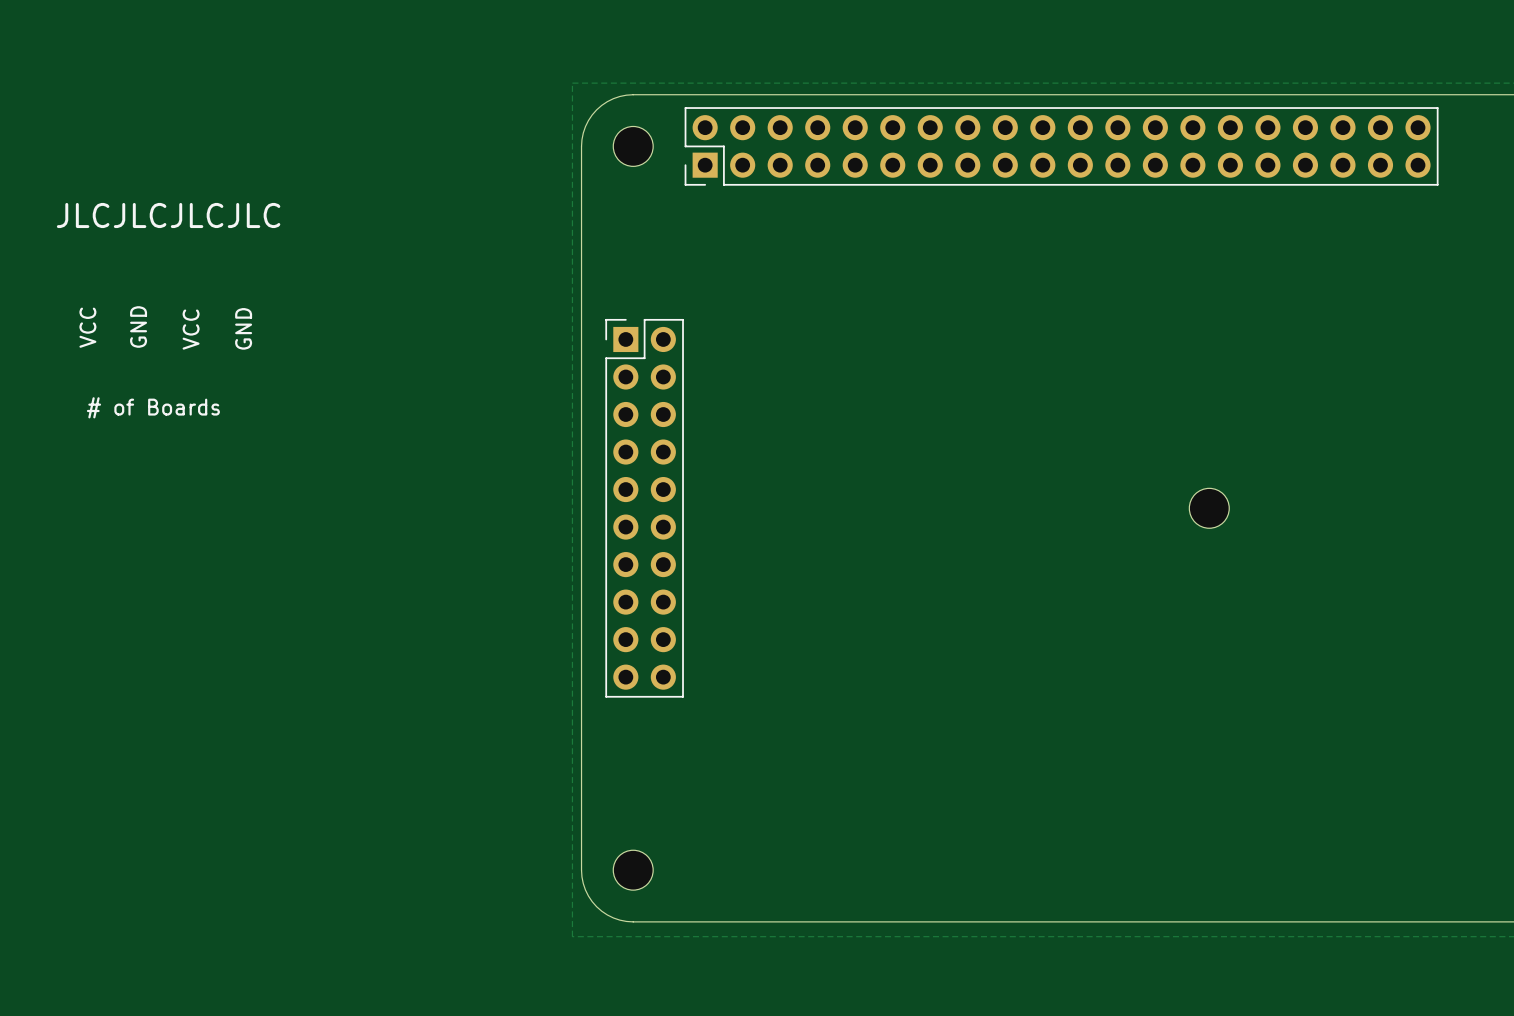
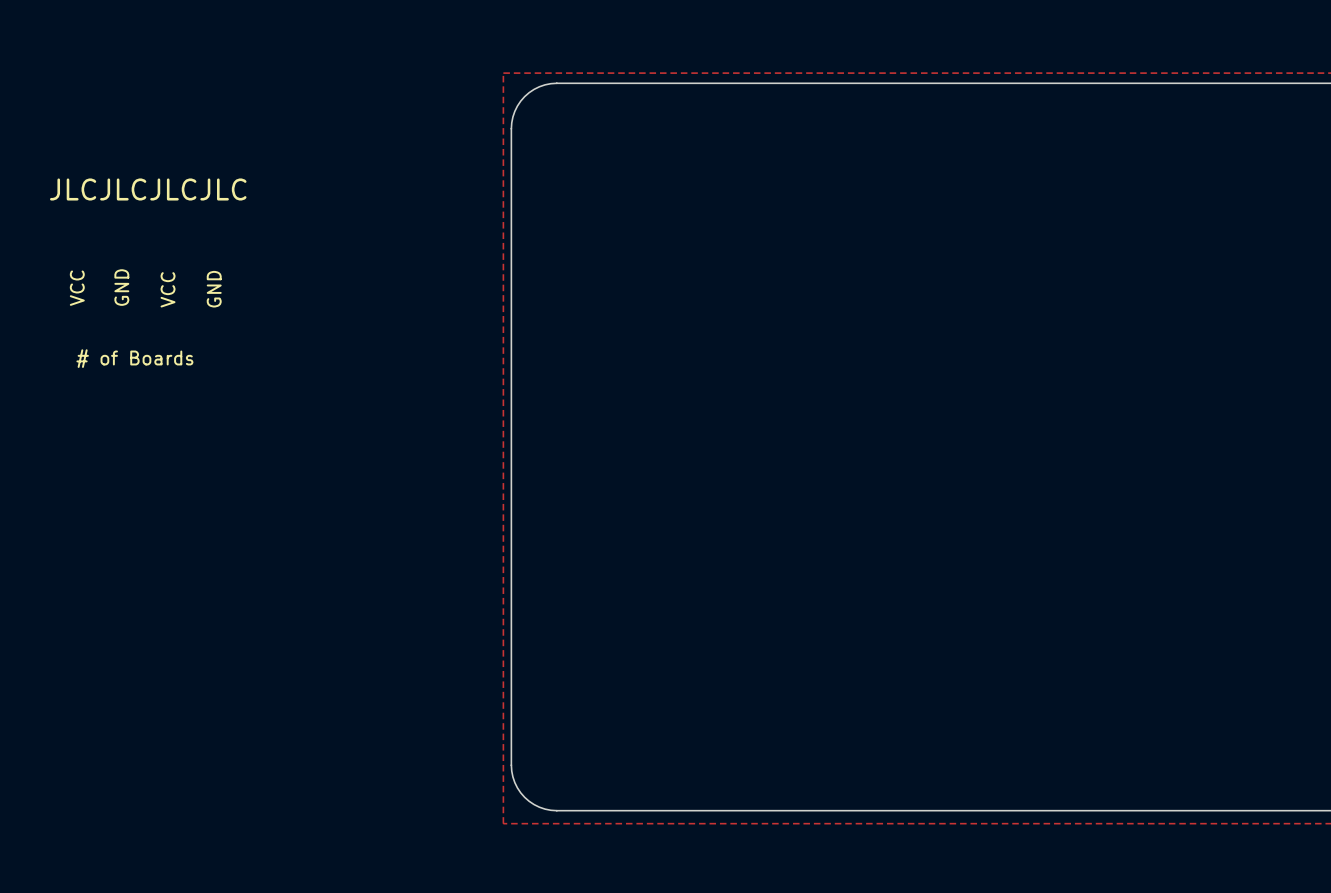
part: (633, 146) -> none
part: (1061, 146) -> none
part: (644, 508) -> none
part: (1209, 508) -> none
part: (633, 870) -> none

